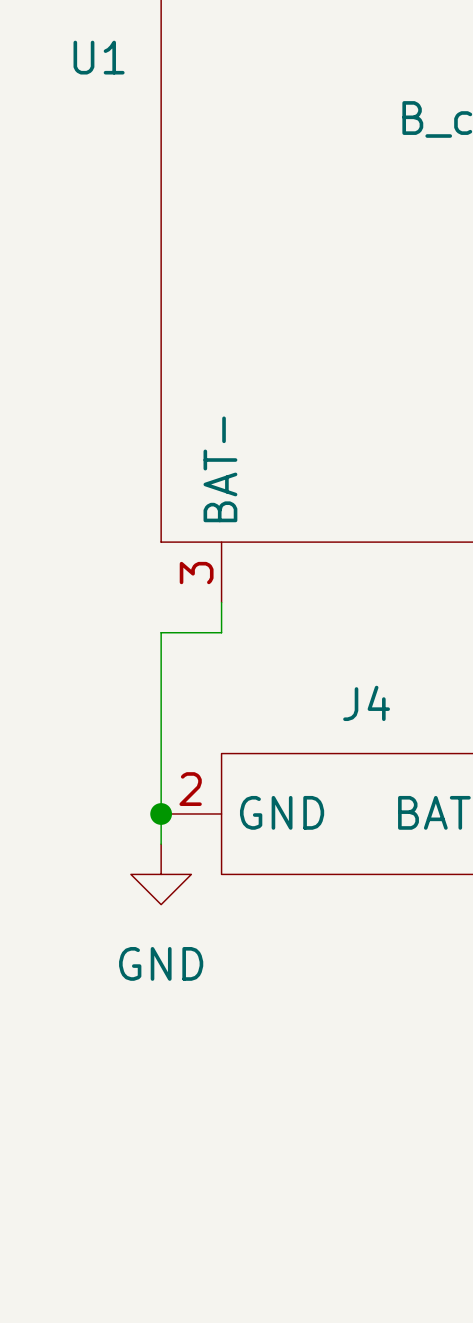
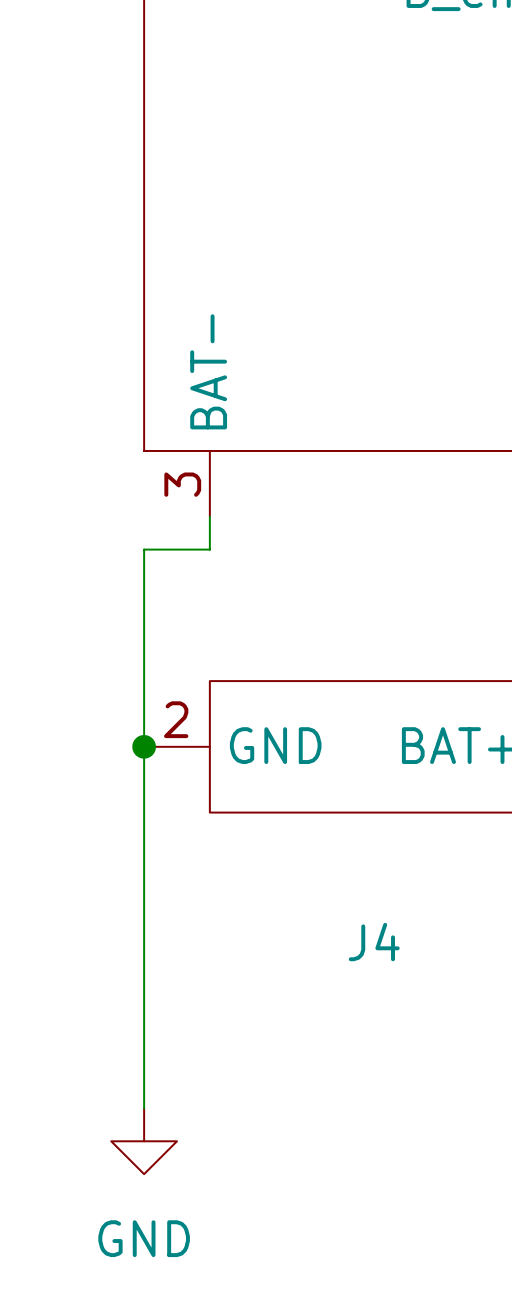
J4 name position: J4 (366, 703) -> J4 (374, 942)
wire: none -> (144, 779) (144, 1108)
power symbol position: GND (161, 874) -> GND (144, 1141)

